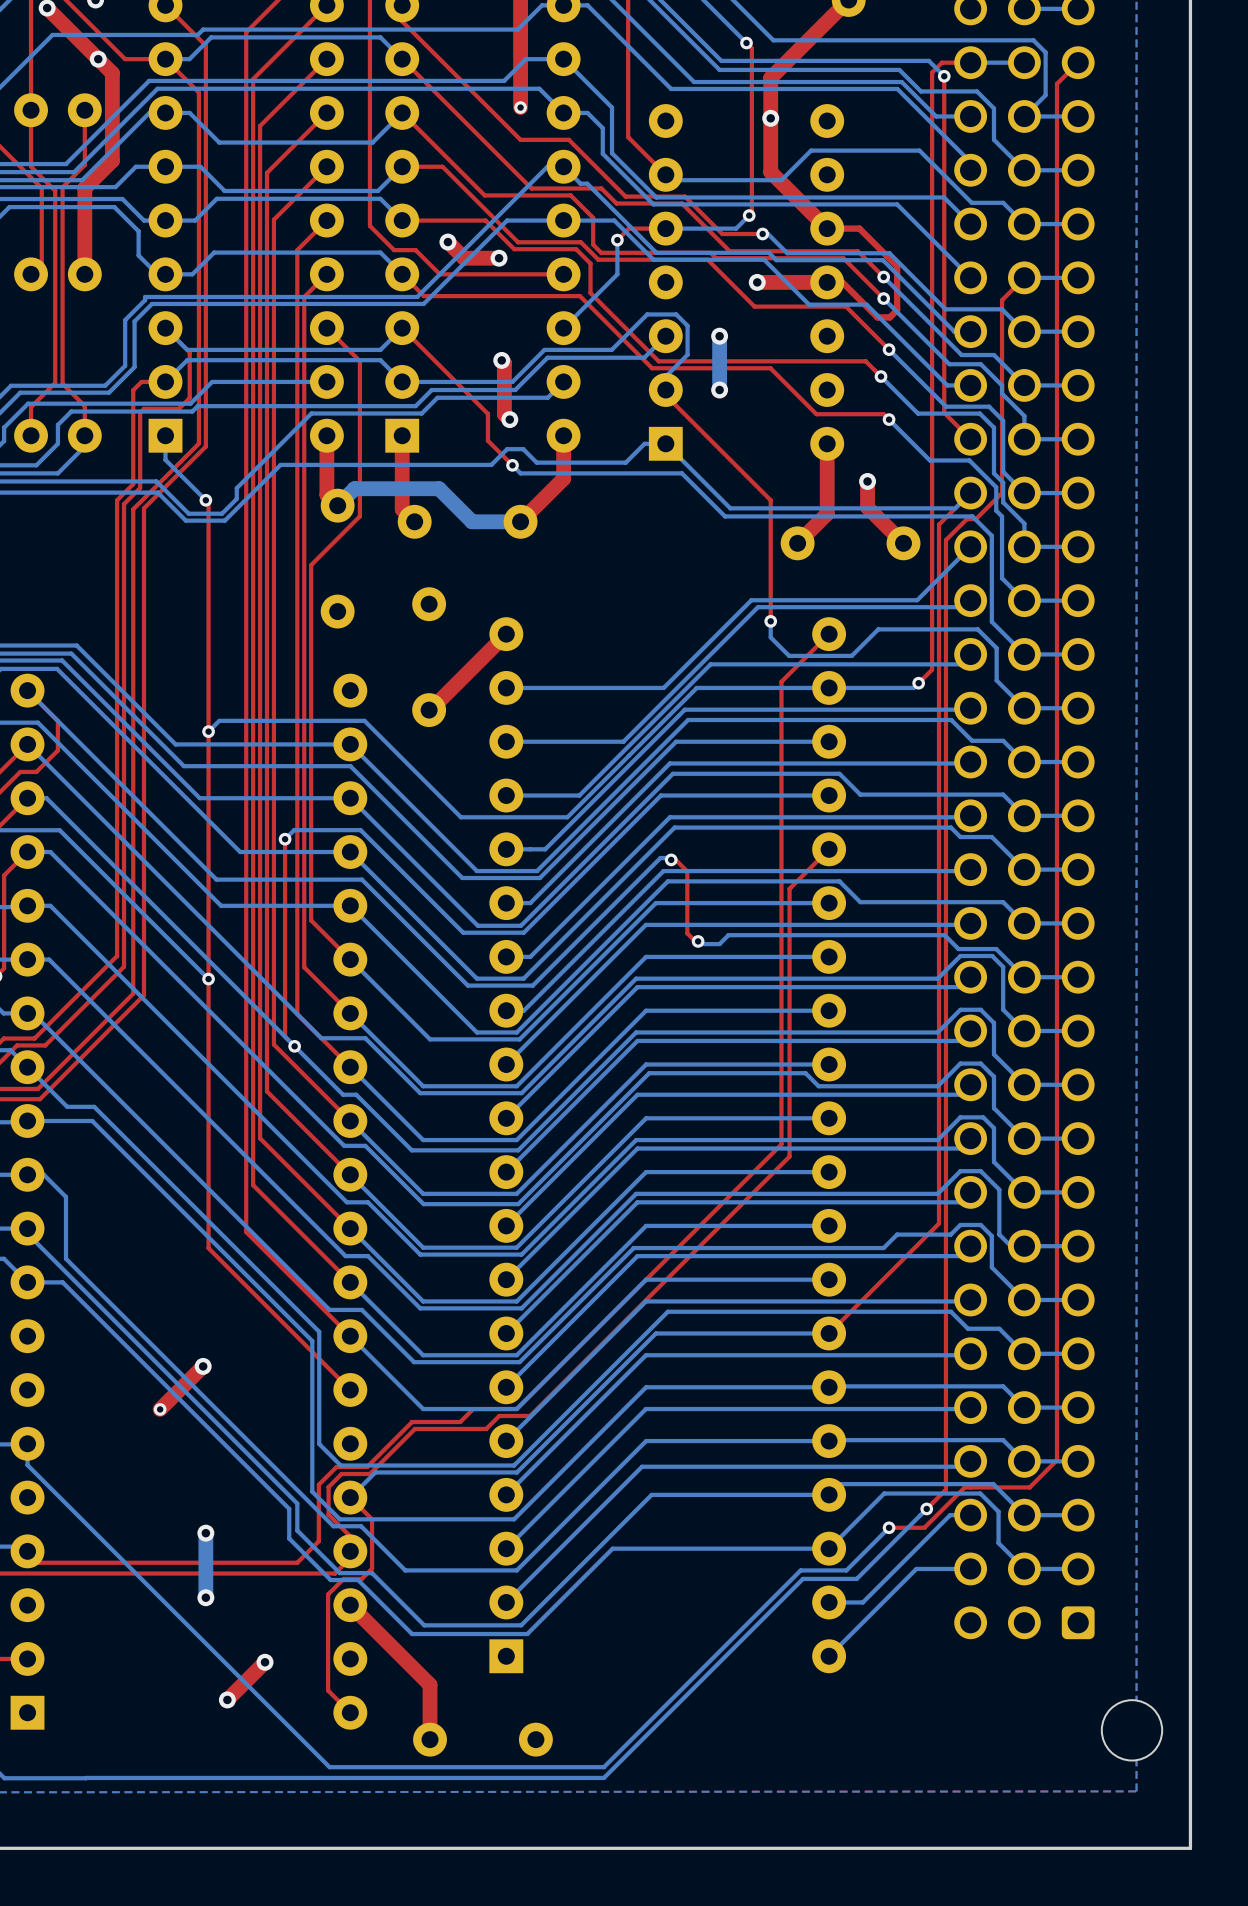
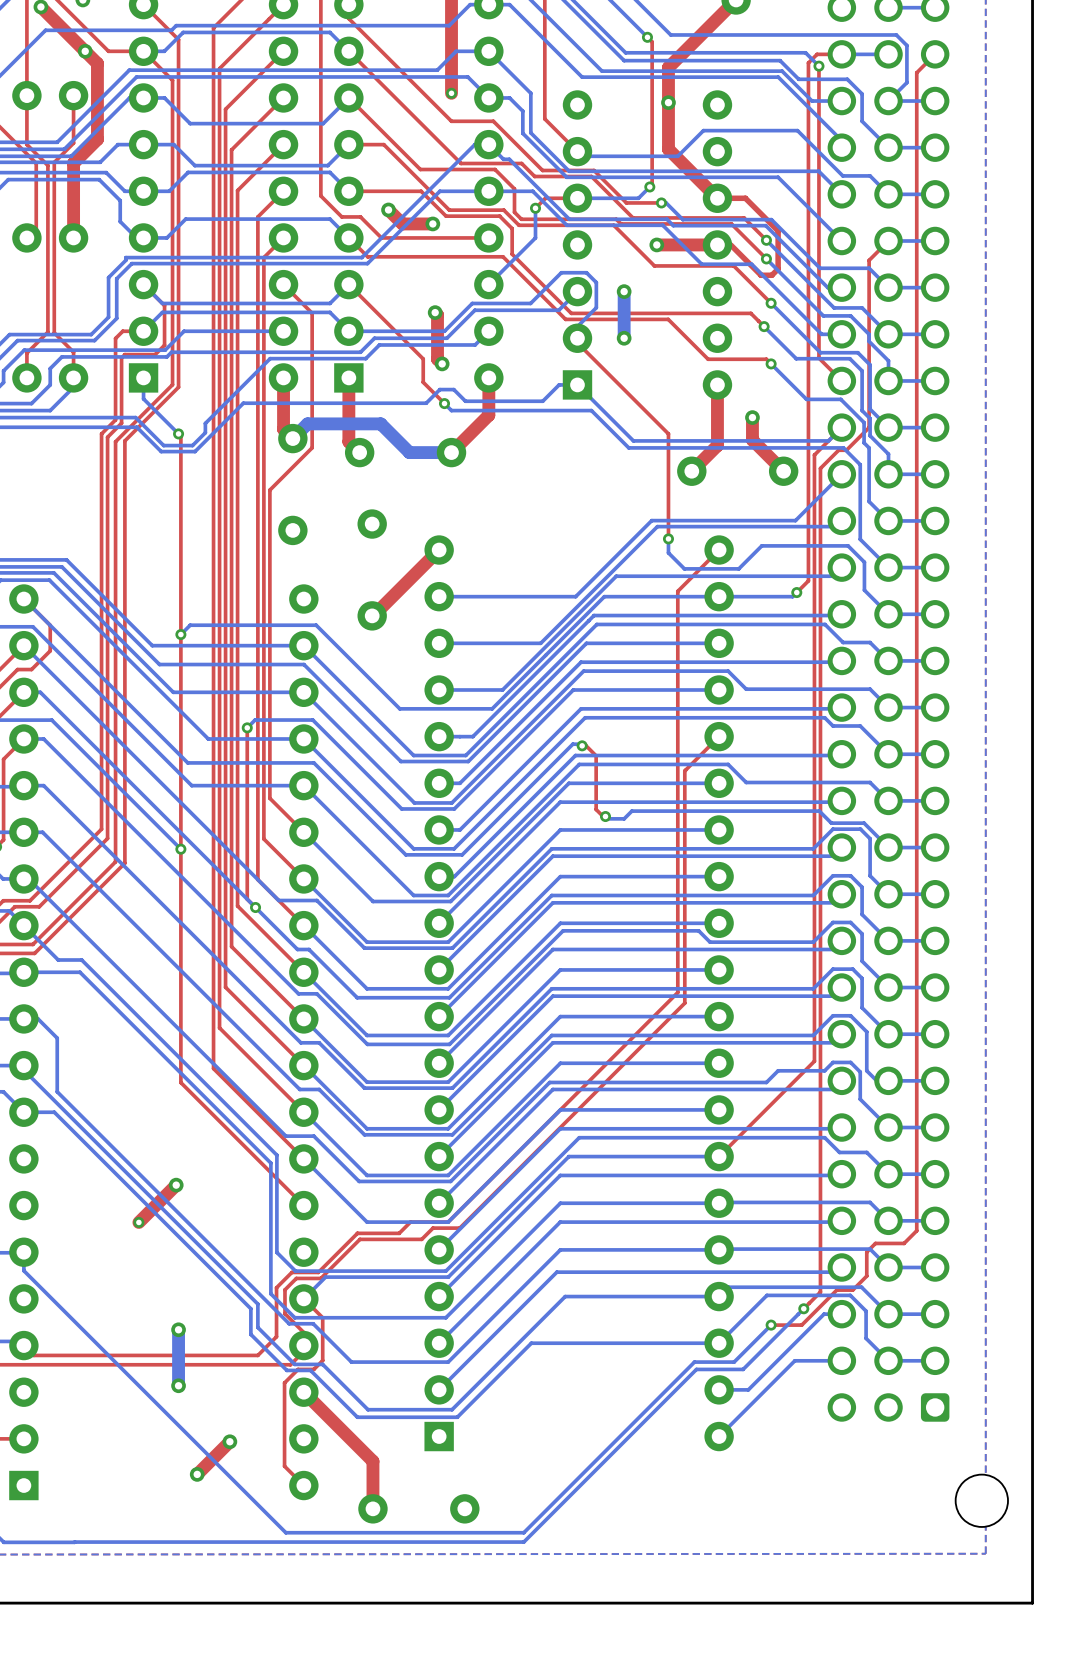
top track: (1056, 1419) (1056, 1460) (1029, 1487) (983, 1487) -> (916, 1230) (904, 1243) (875, 1243) (866, 1252) (866, 1276) (852, 1290)

